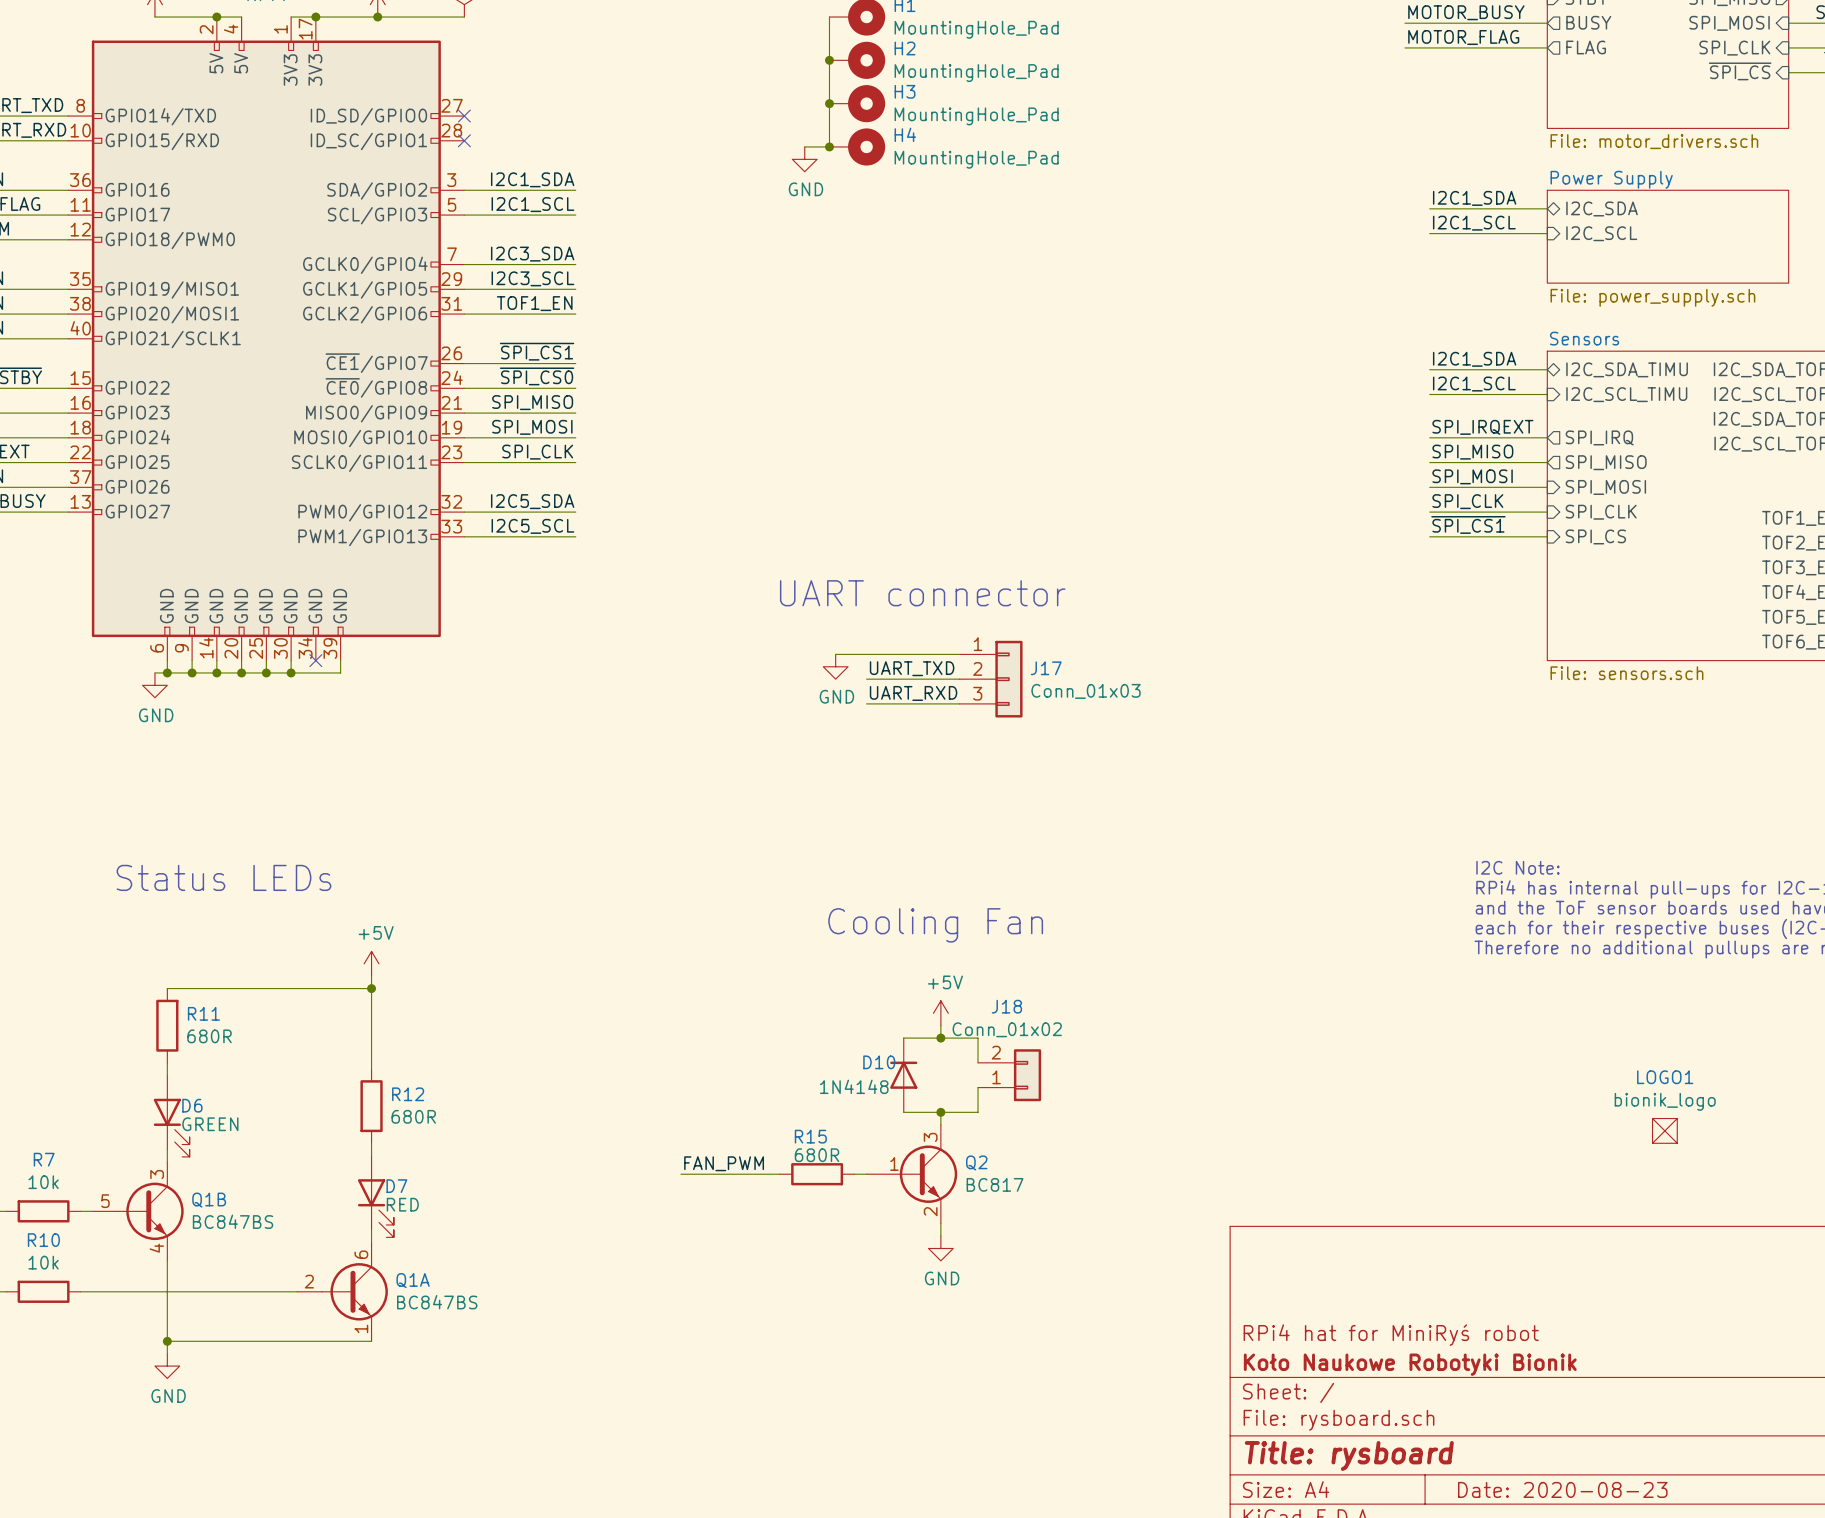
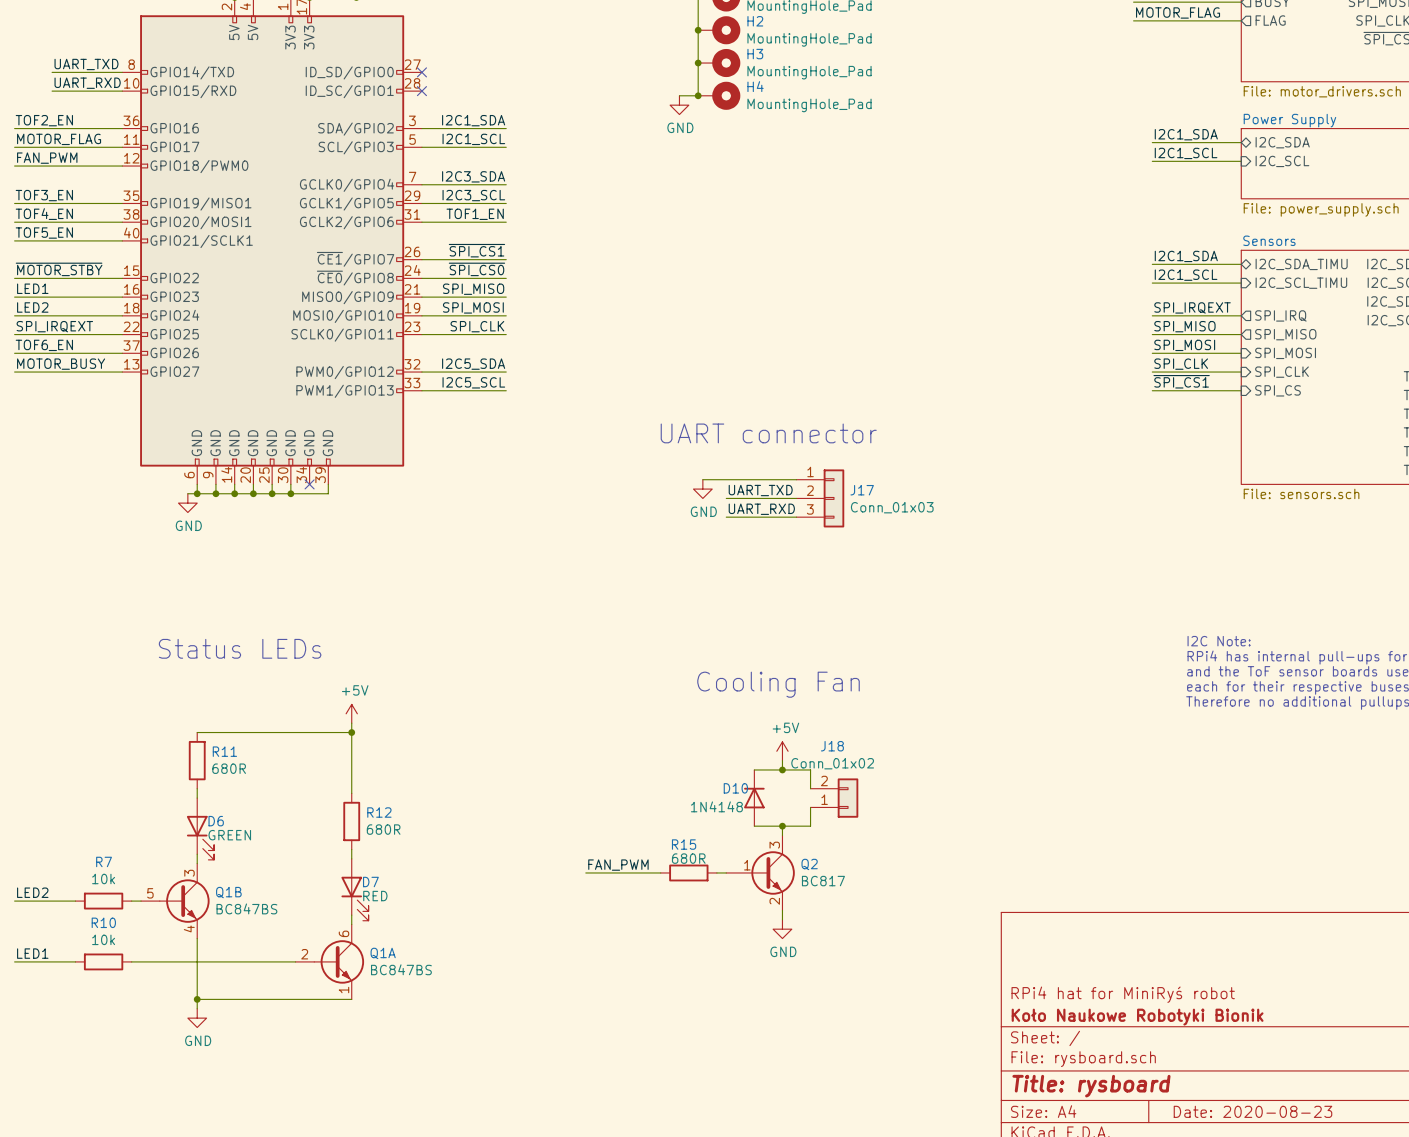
LOGO1: bionik_logo (1664, 1130) -> none

